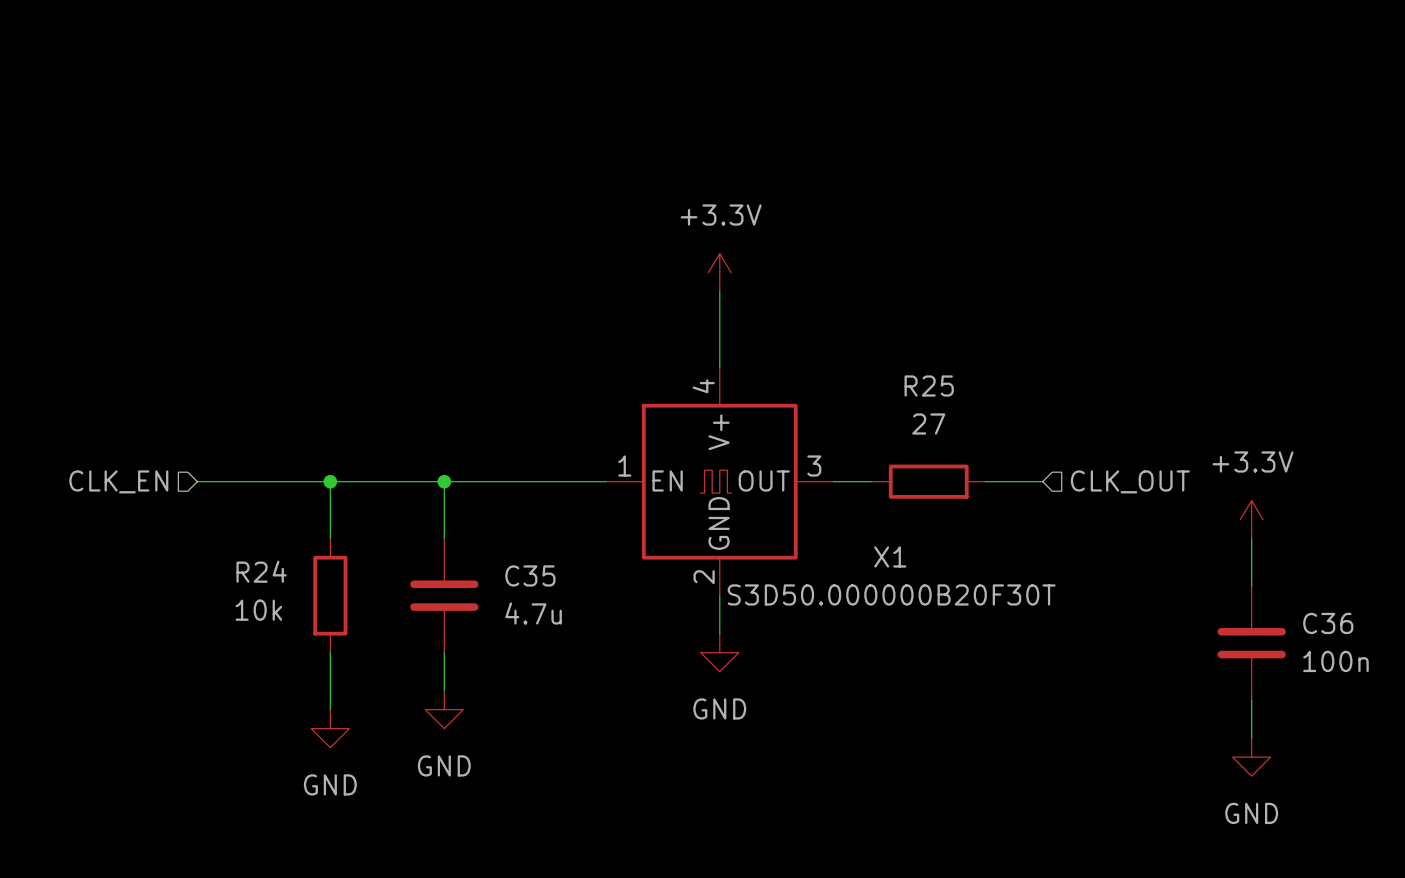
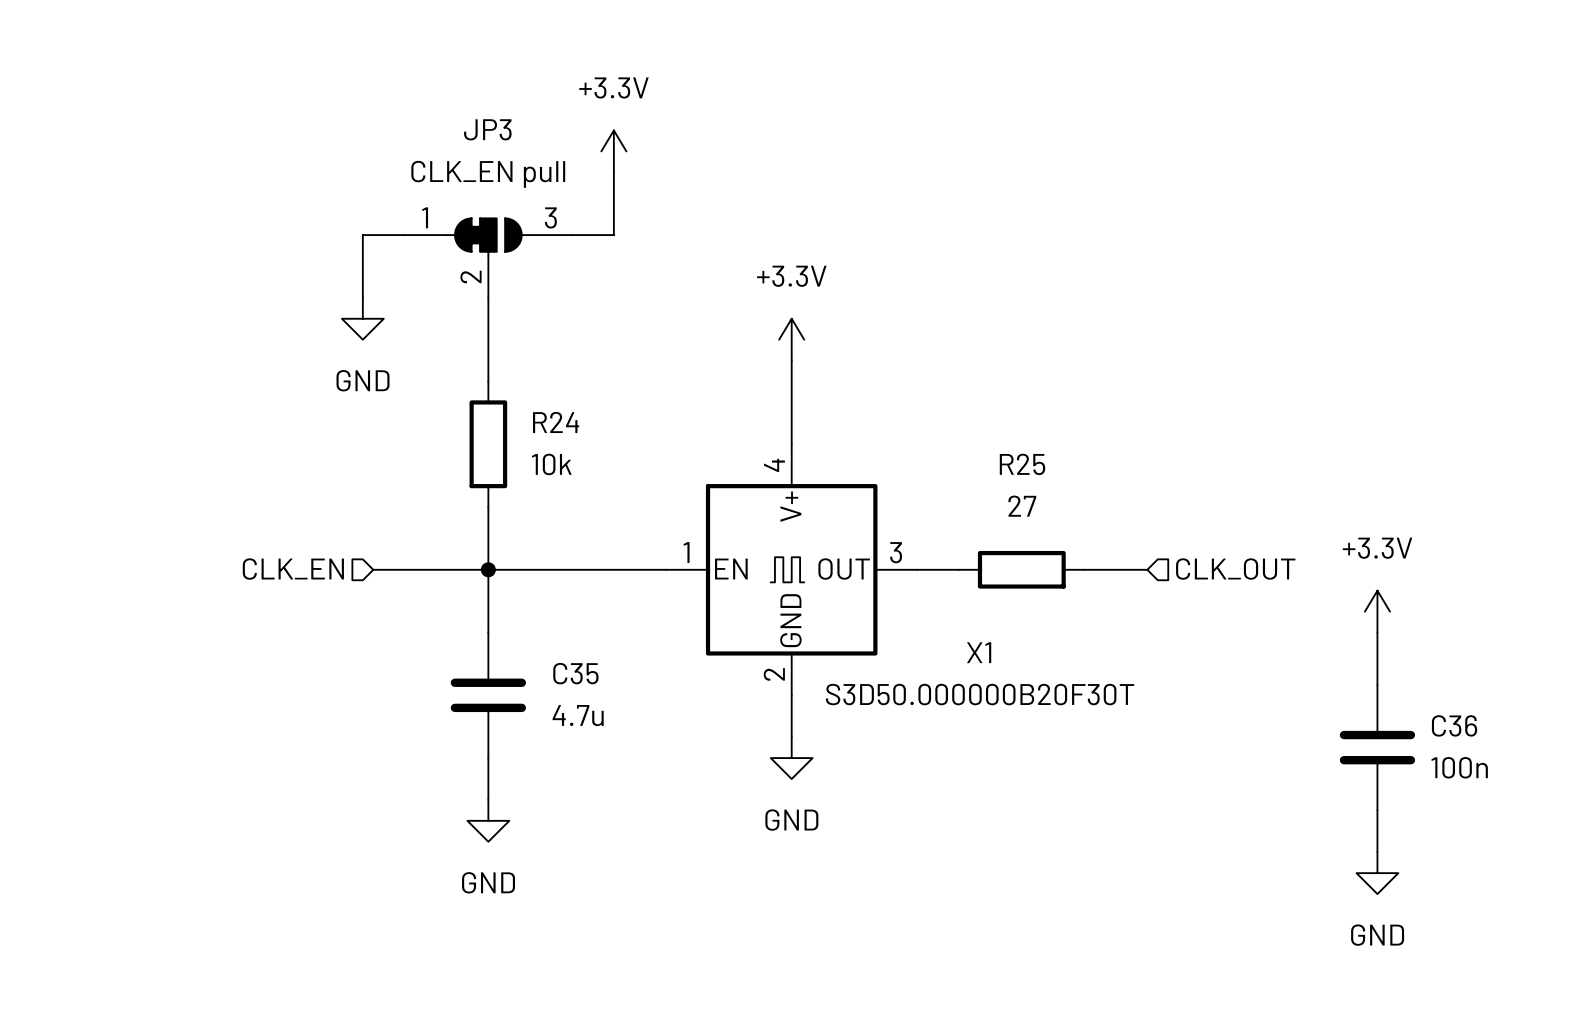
power symbol: none -> +3.3V (613, 151)
wire: none -> (613, 172) (613, 235) (572, 235)
wire: none -> (404, 235) (362, 235) (362, 297)
JP3: none -> CLK_EN pull (488, 258)
wire: none -> (488, 297) (488, 381)
power symbol: none -> GND (362, 318)
hierarchical label position: CLK_EN (118, 481) -> CLK_EN (293, 569)
wire: (197, 481) (339, 481) -> none
wire: (330, 481) (330, 538) -> (488, 507) (488, 569)
junction: (330, 481) -> none
R24 name position: R24 (261, 571) -> R24 (556, 422)
R24 position: (330, 595) -> (488, 444)
R24 value position: 10k (258, 610) -> 10k (551, 464)
wire: (330, 652) (330, 709) -> none
power symbol: GND (330, 728) -> none

